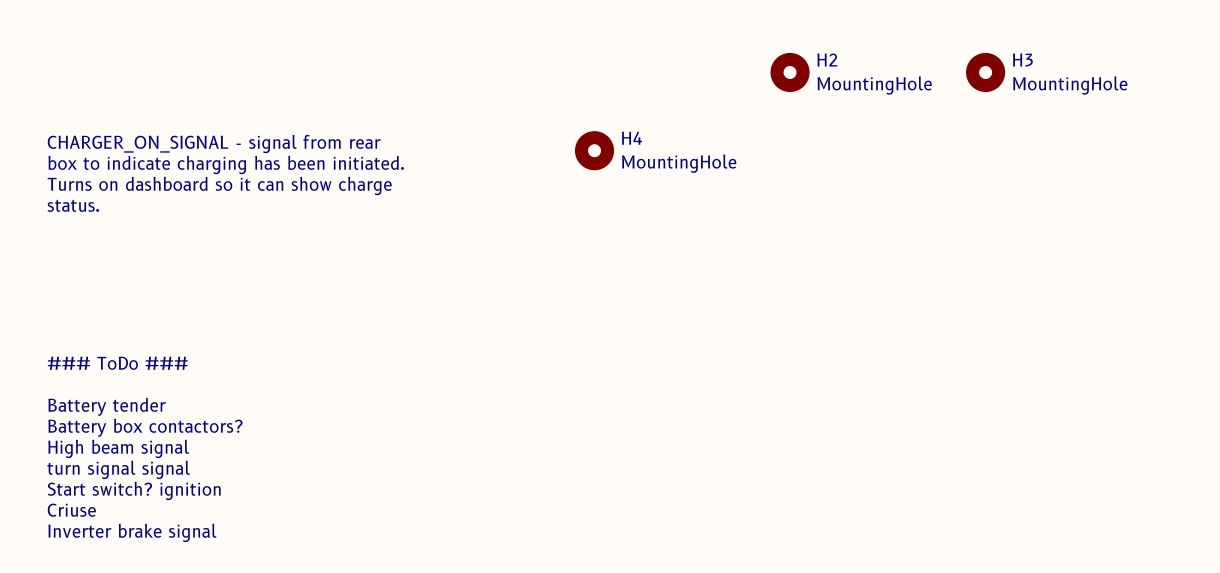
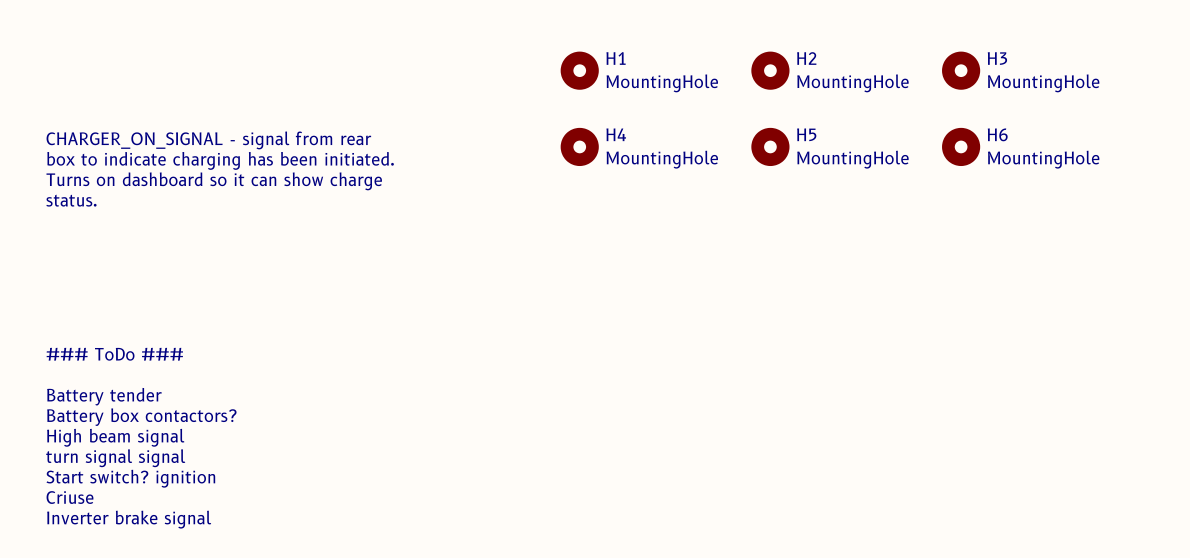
H1: none -> MountingHole (579, 70)
H5: none -> MountingHole (770, 146)
H6: none -> MountingHole (961, 146)

